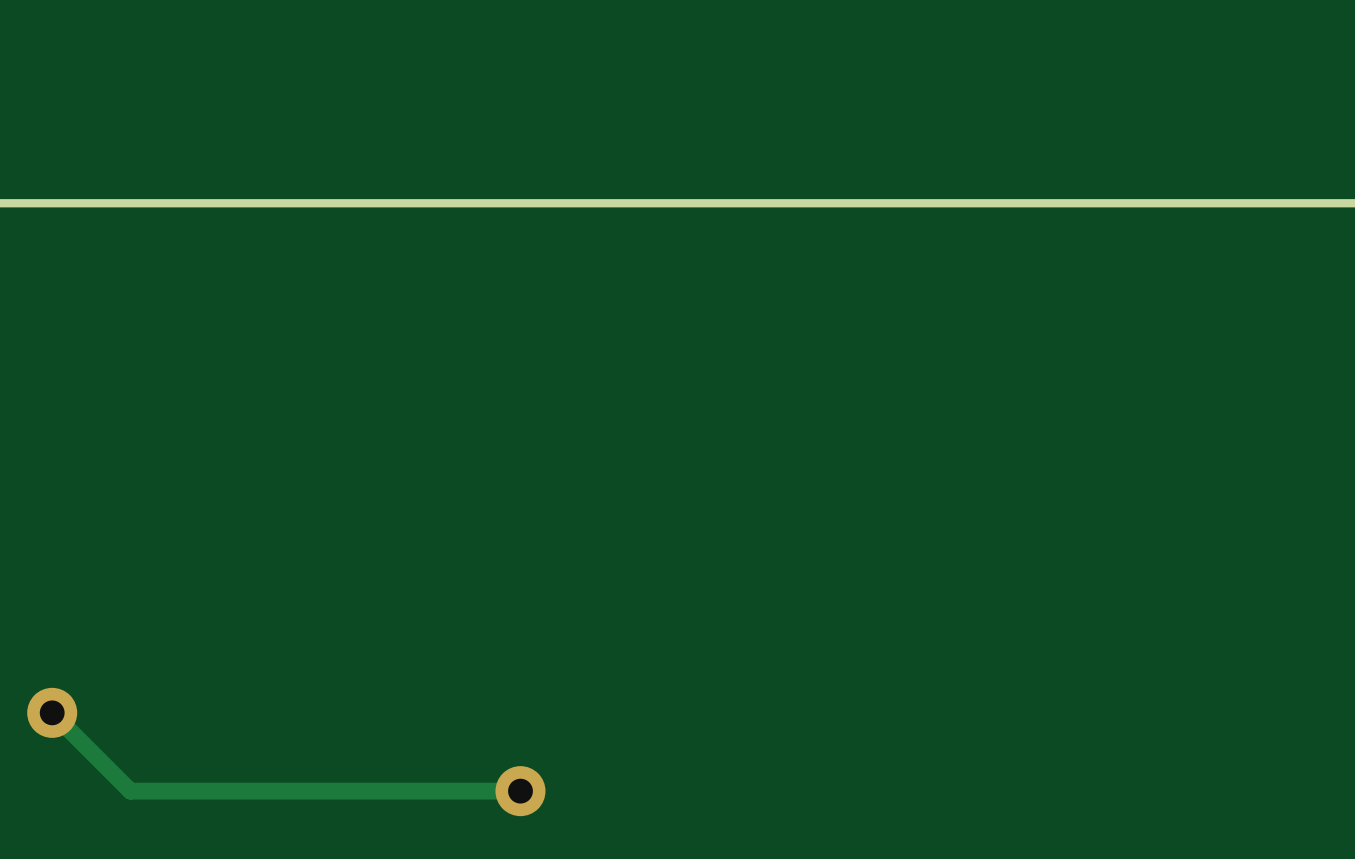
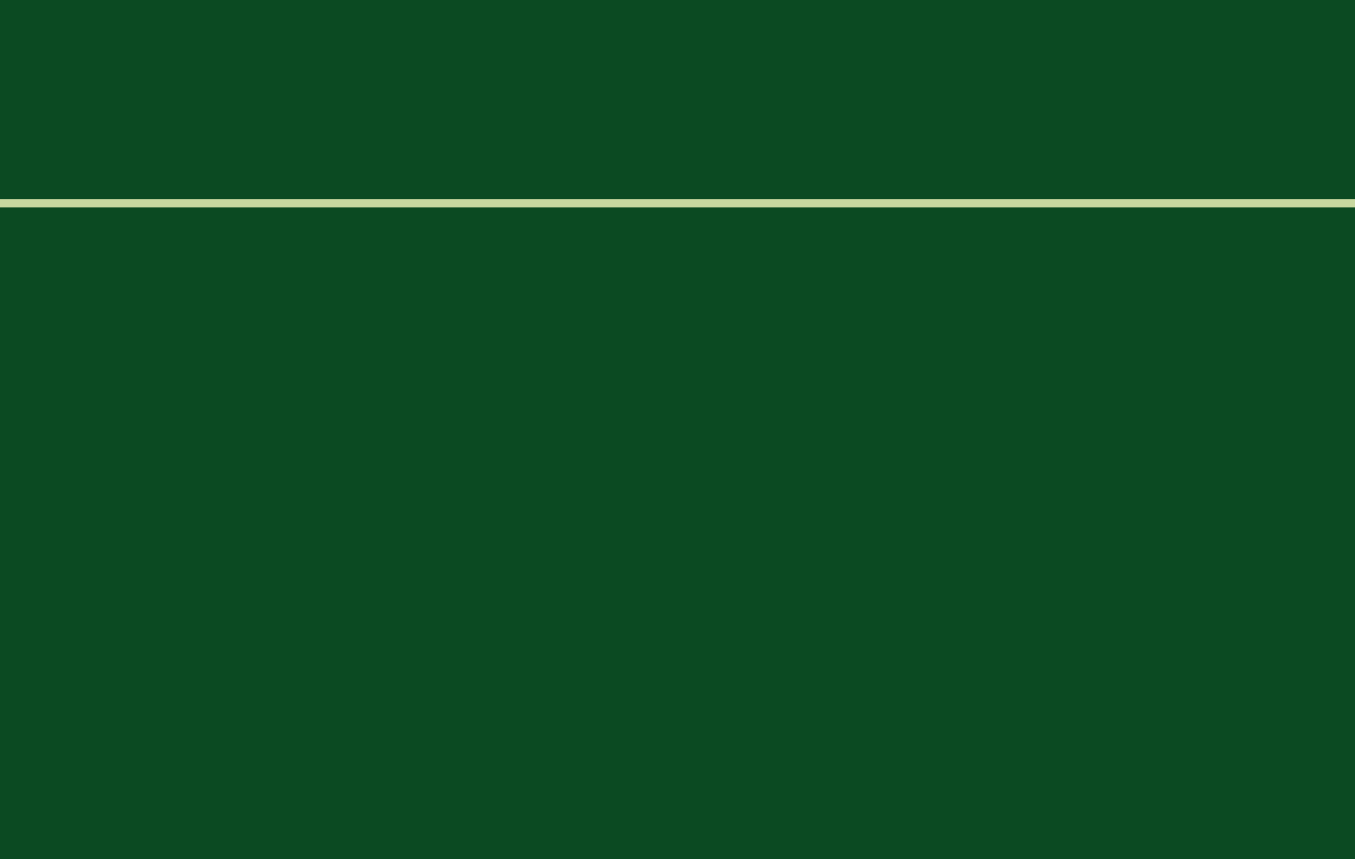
track: (52, 712) (130, 791) (520, 791) -> none
via: (52, 712) -> none
via: (520, 791) -> none

